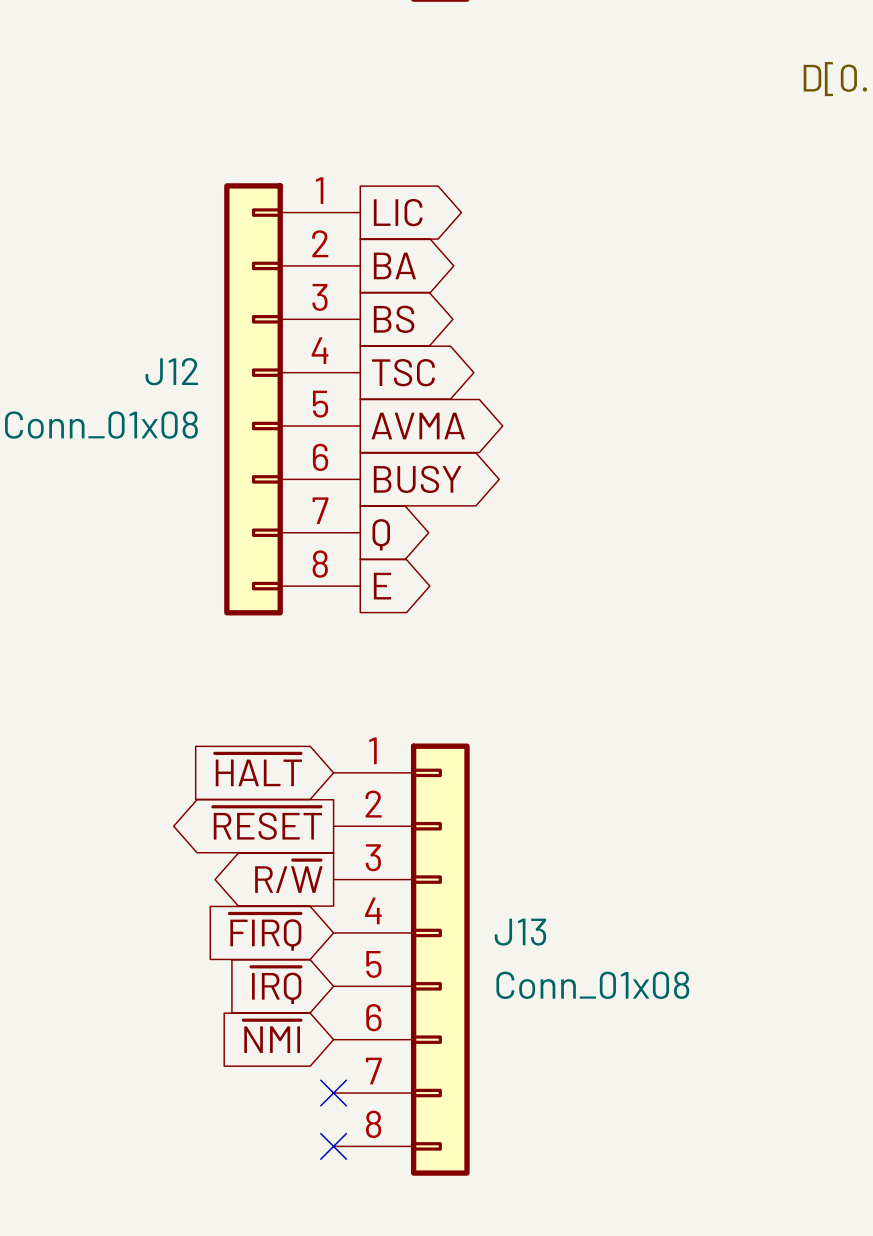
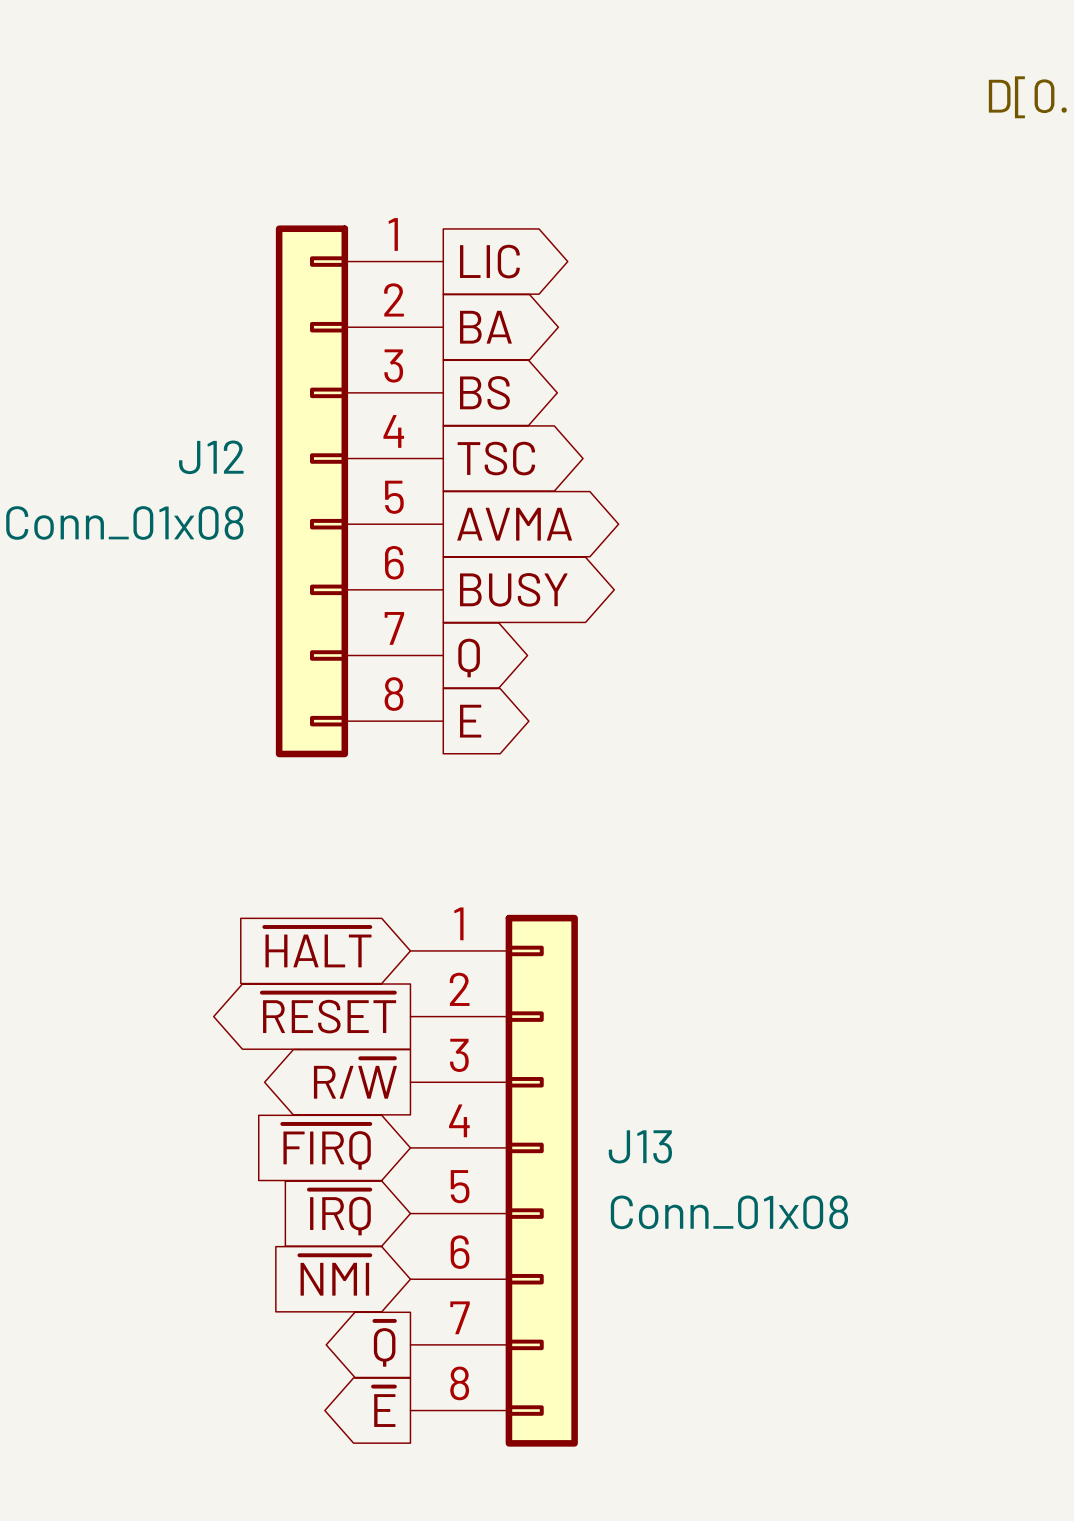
global label: none -> ~{Q} (384, 1343)
no-connect mark: (333, 1093) -> none
global label: none -> ~{E} (384, 1406)
no-connect mark: (333, 1146) -> none

